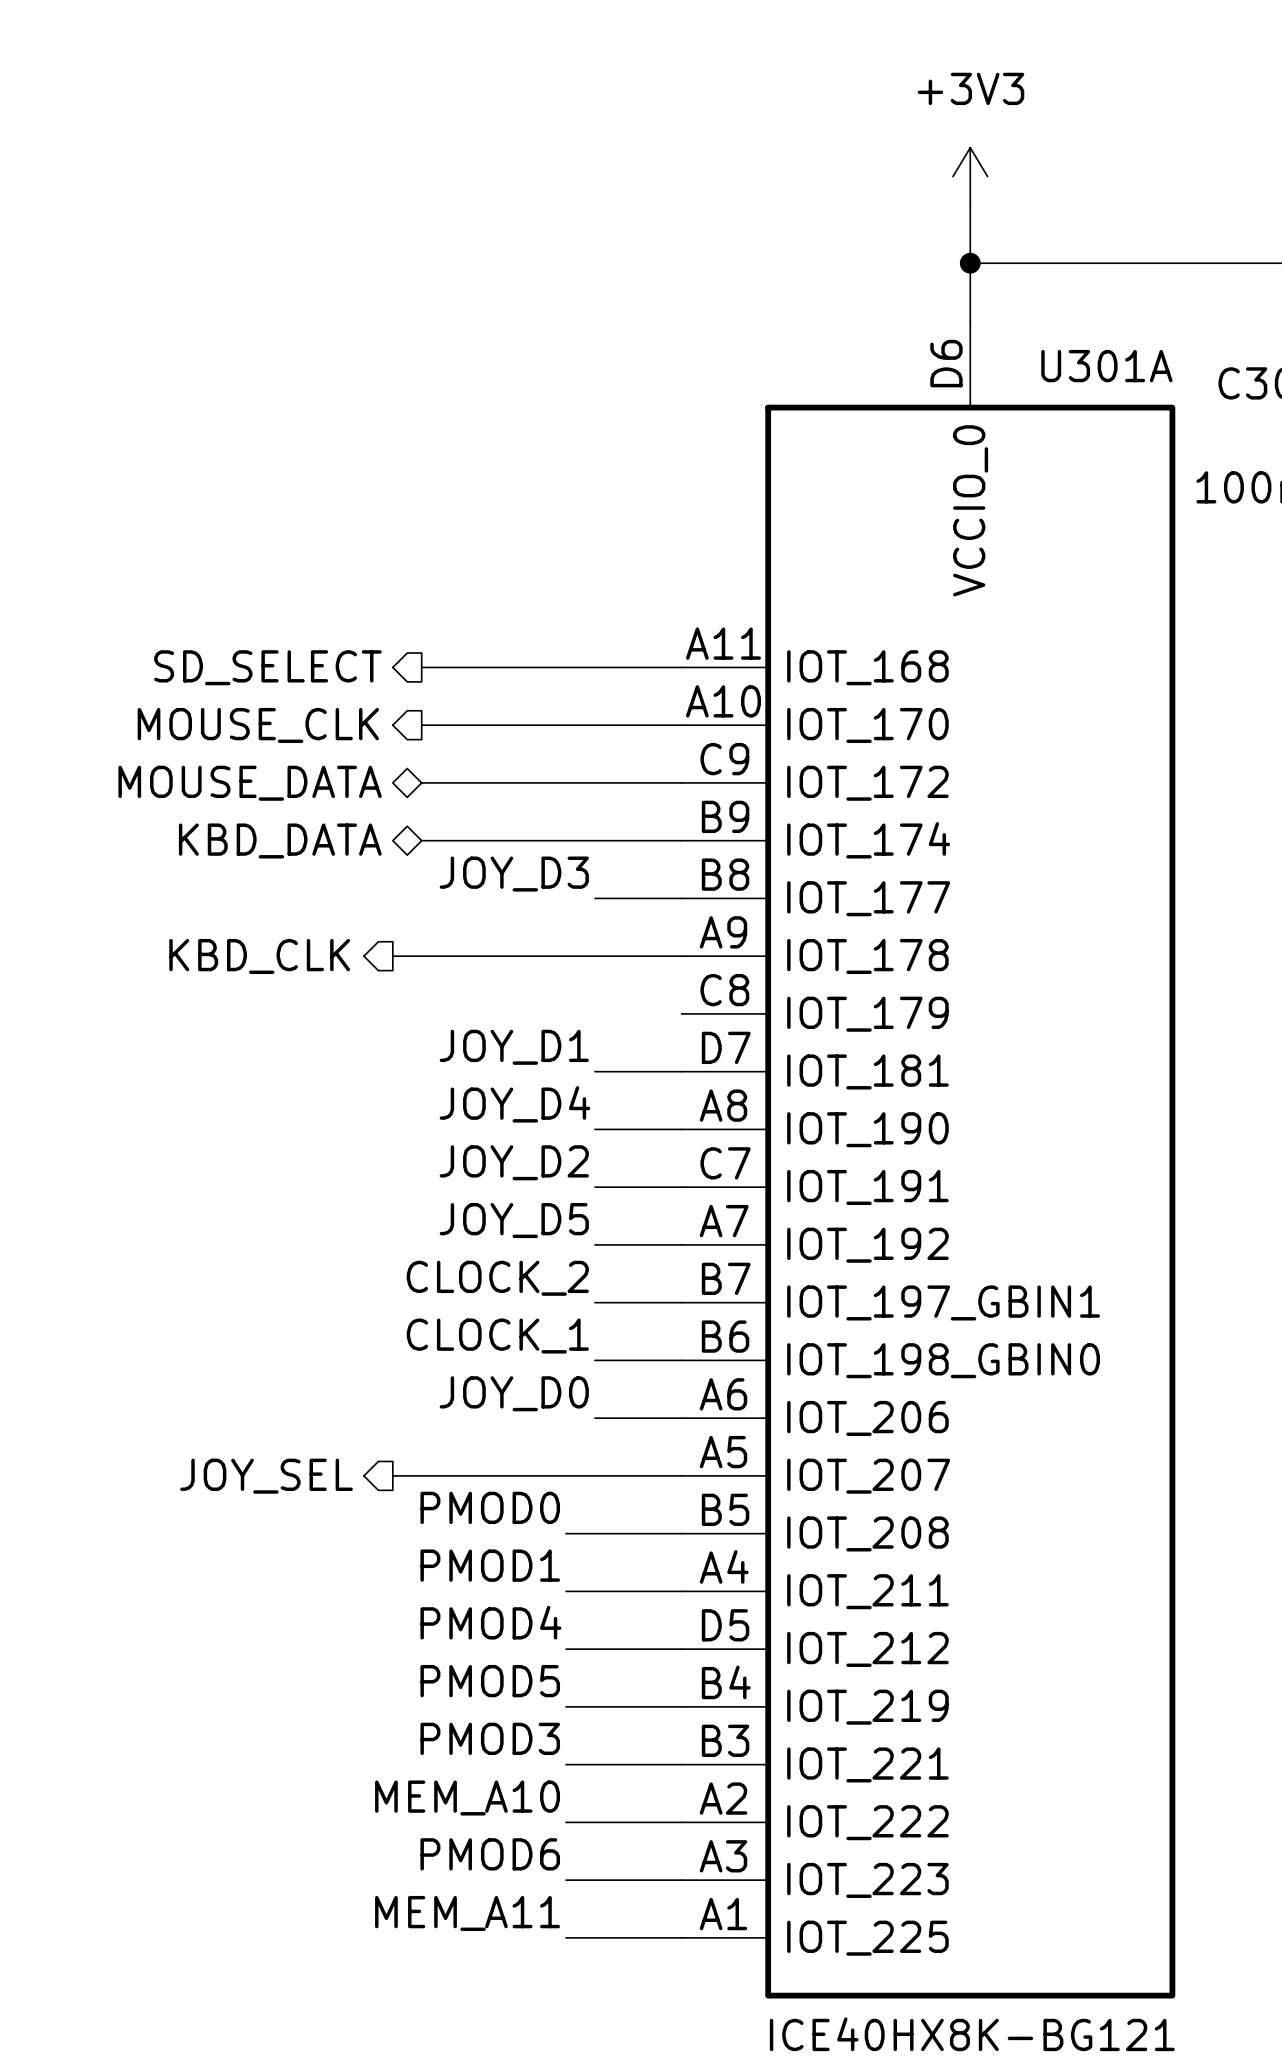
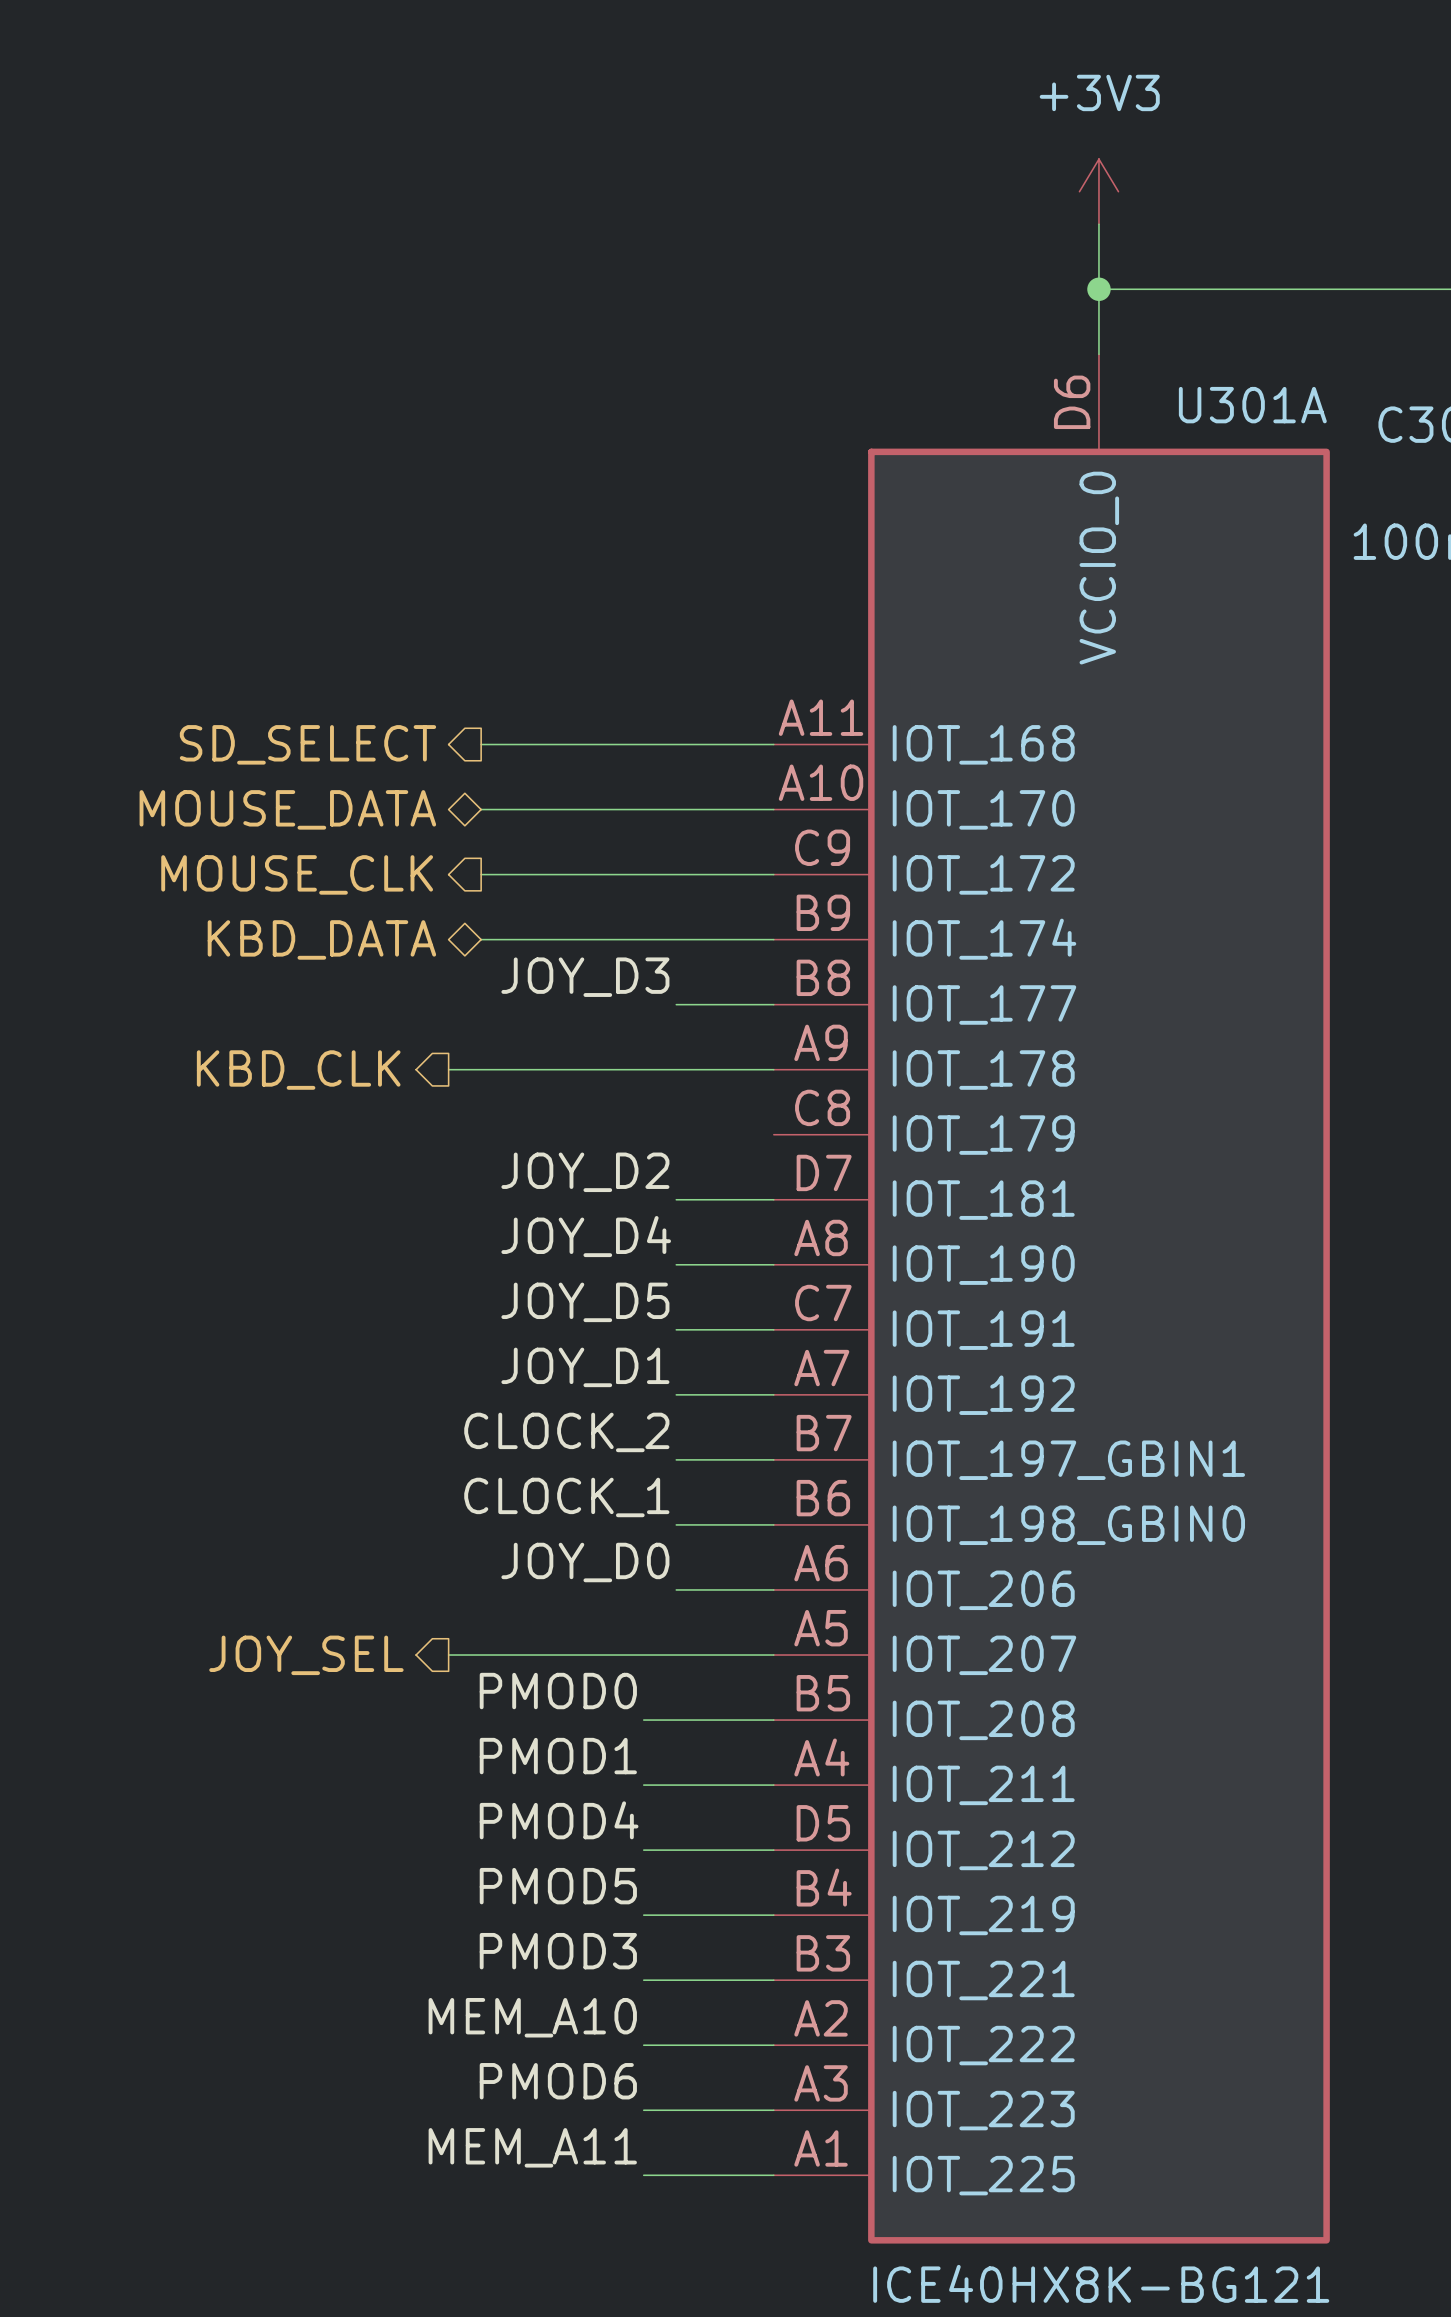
hierarchical label shape: output (258, 725) -> bidirectional (287, 809)
hierarchical label: MOUSE_CLK (258, 725) -> MOUSE_DATA (287, 809)
hierarchical label shape: bidirectional (250, 783) -> output (297, 874)
hierarchical label: MOUSE_DATA (250, 783) -> MOUSE_CLK (297, 874)
label: JOY_D1 (514, 1047) -> JOY_D2 (585, 1172)
label: JOY_D2 (514, 1162) -> JOY_D5 (585, 1302)
label: JOY_D5 (514, 1220) -> JOY_D1 (585, 1367)

